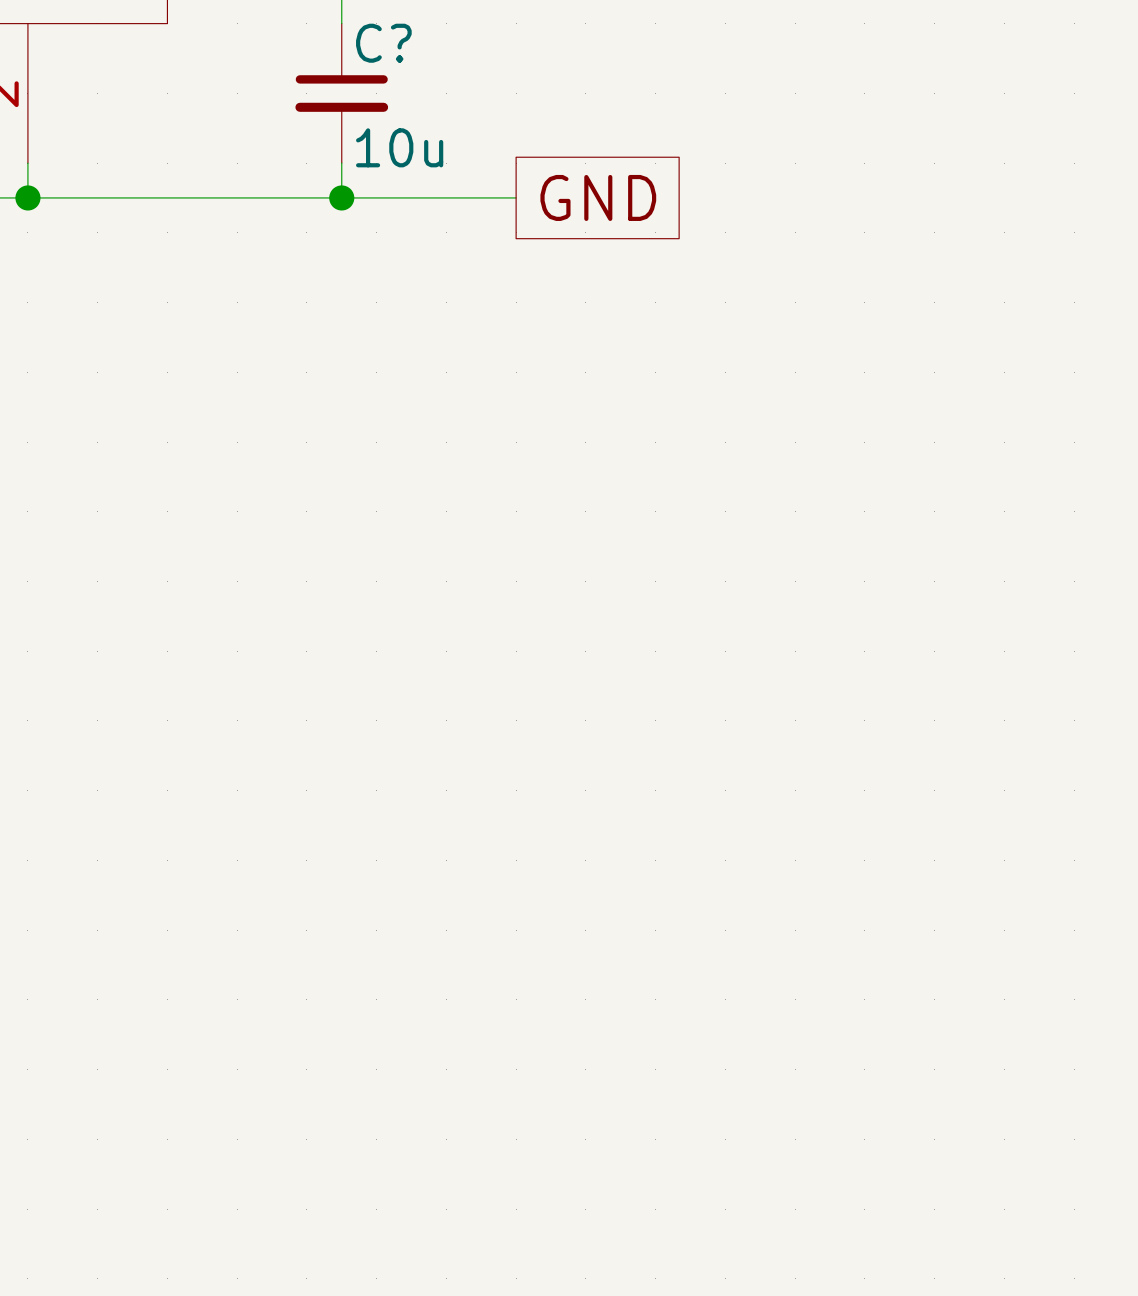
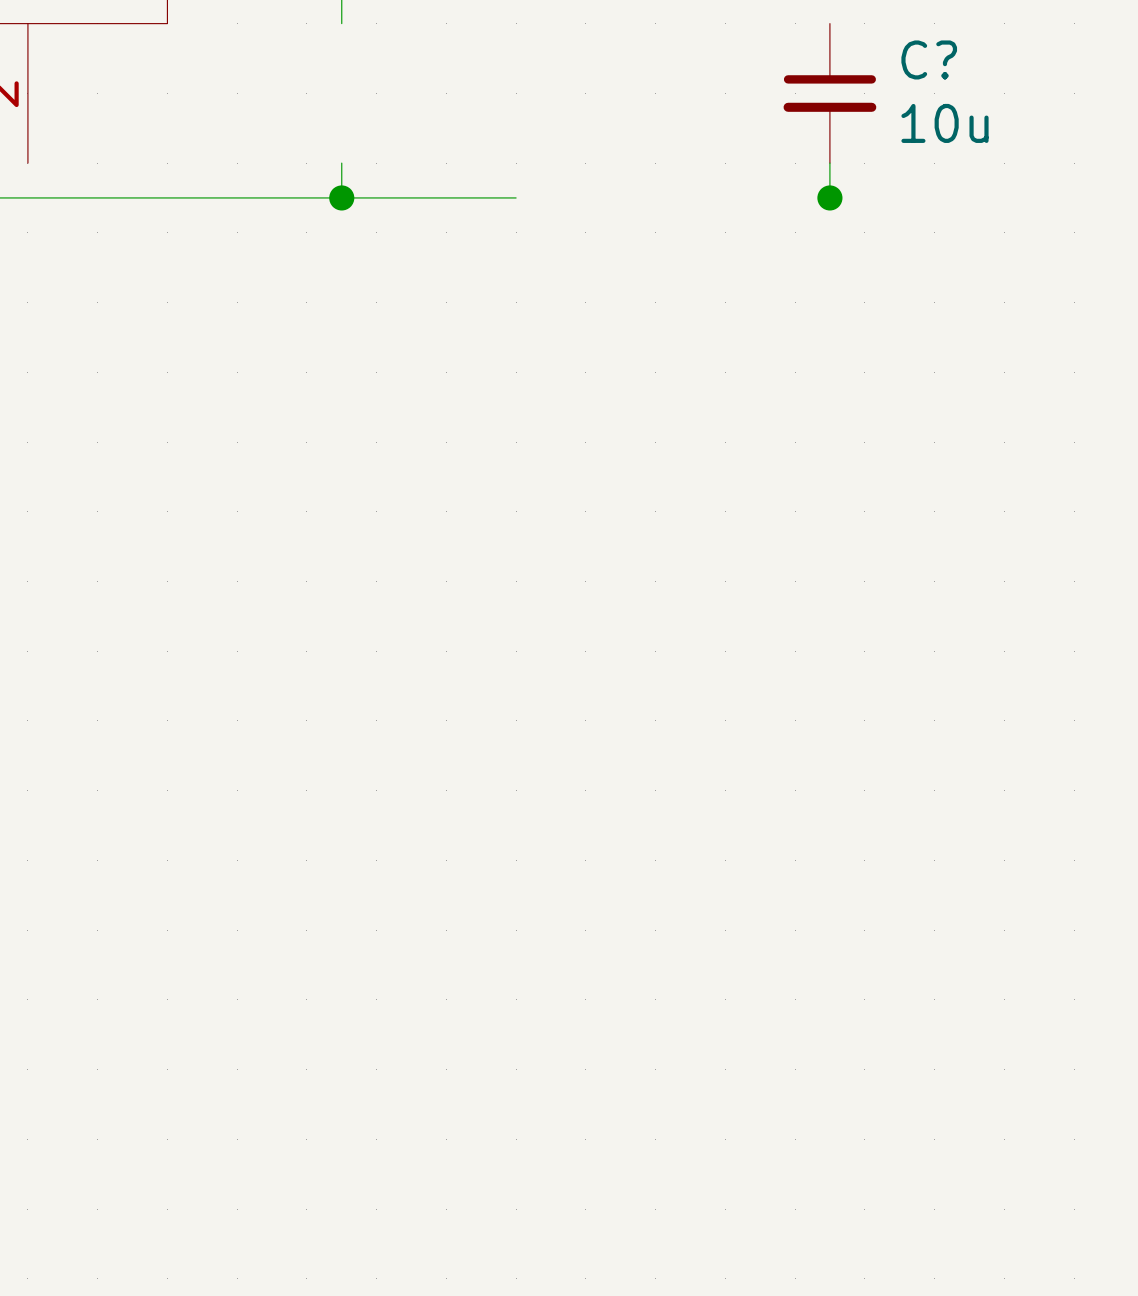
C?: 10u (341, 93) -> none
C?: none -> 10u (829, 93)
wire: (27, 163) (27, 197) -> none
wire: none -> (829, 163) (829, 197)
junction: (27, 197) -> none
global label: GND (598, 197) -> none
junction: none -> (829, 197)

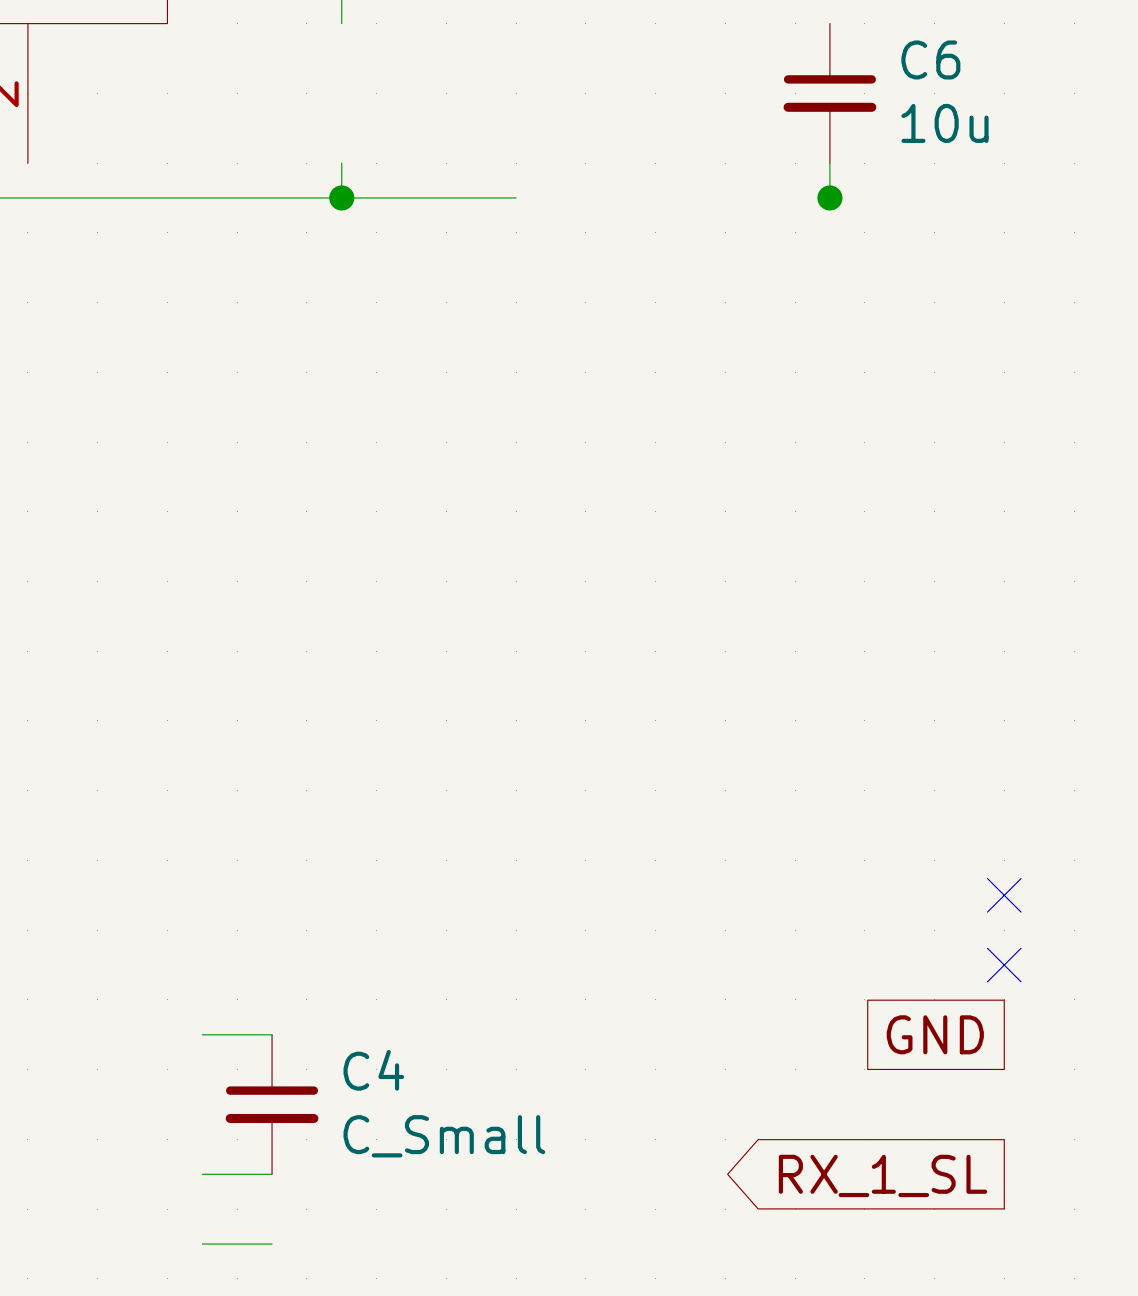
C? name: C? (929, 59) -> C6 (930, 59)
no-connect mark: none -> (1004, 895)
no-connect mark: none -> (1004, 965)
wire: none -> (202, 1034) (272, 1034)
global label: none -> GND (935, 1034)
C4: none -> C_Small (272, 1104)
wire: none -> (202, 1174) (272, 1174)
global label: none -> RX_1_SL (883, 1175)
wire: none -> (202, 1244) (272, 1244)

